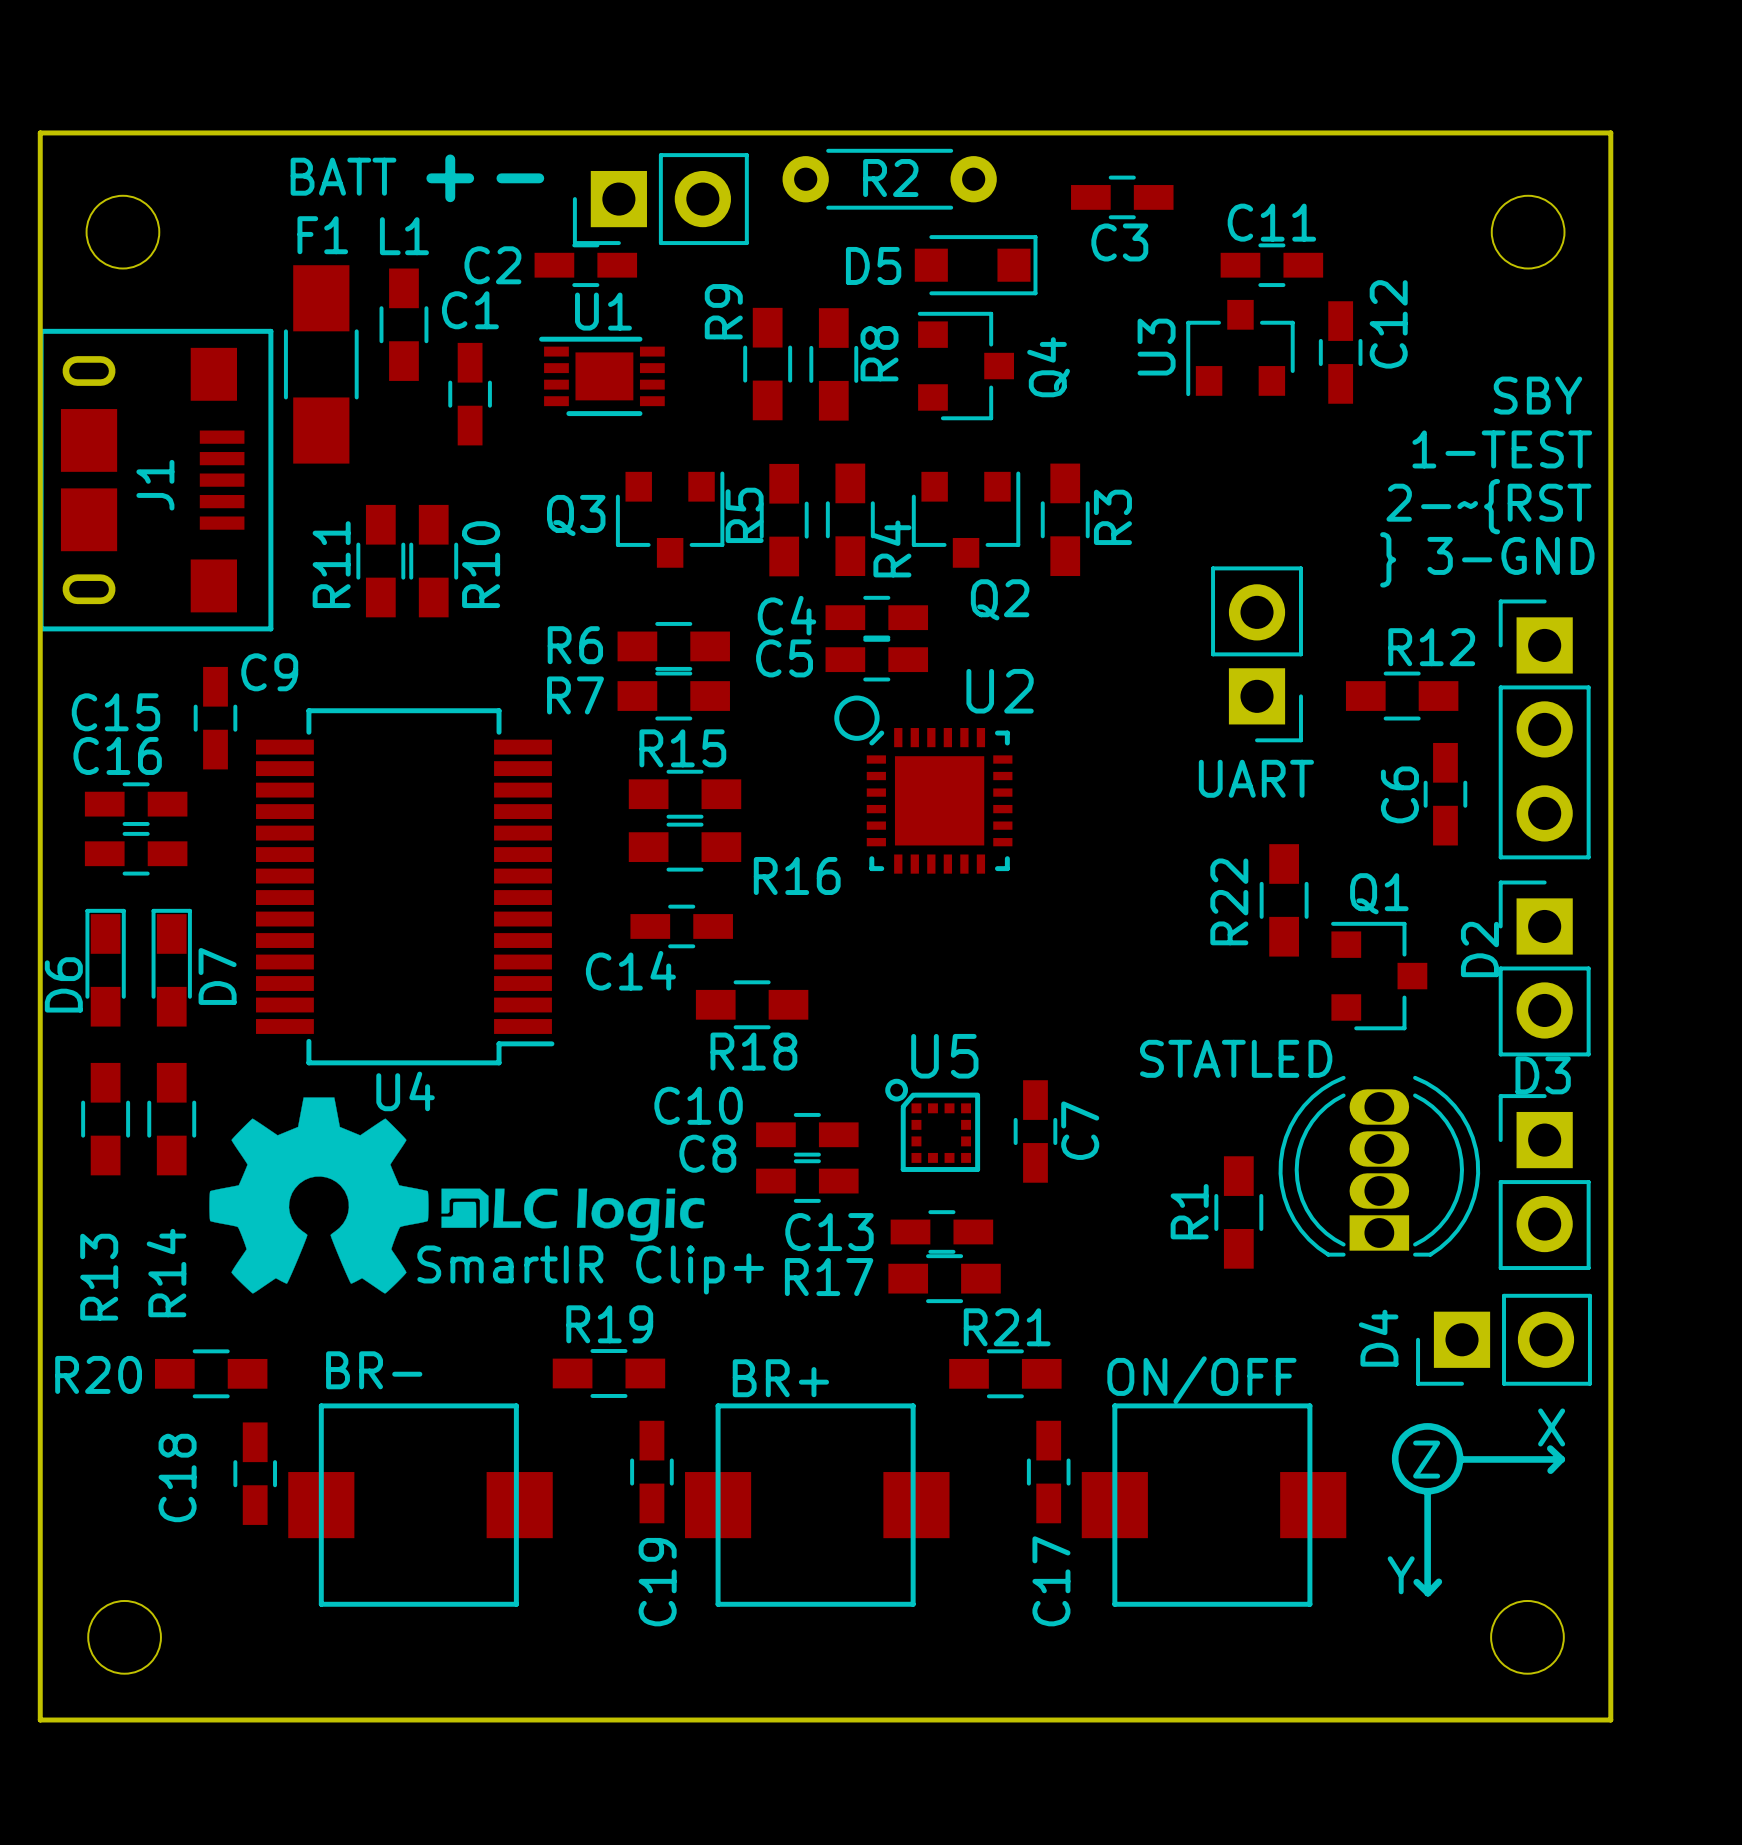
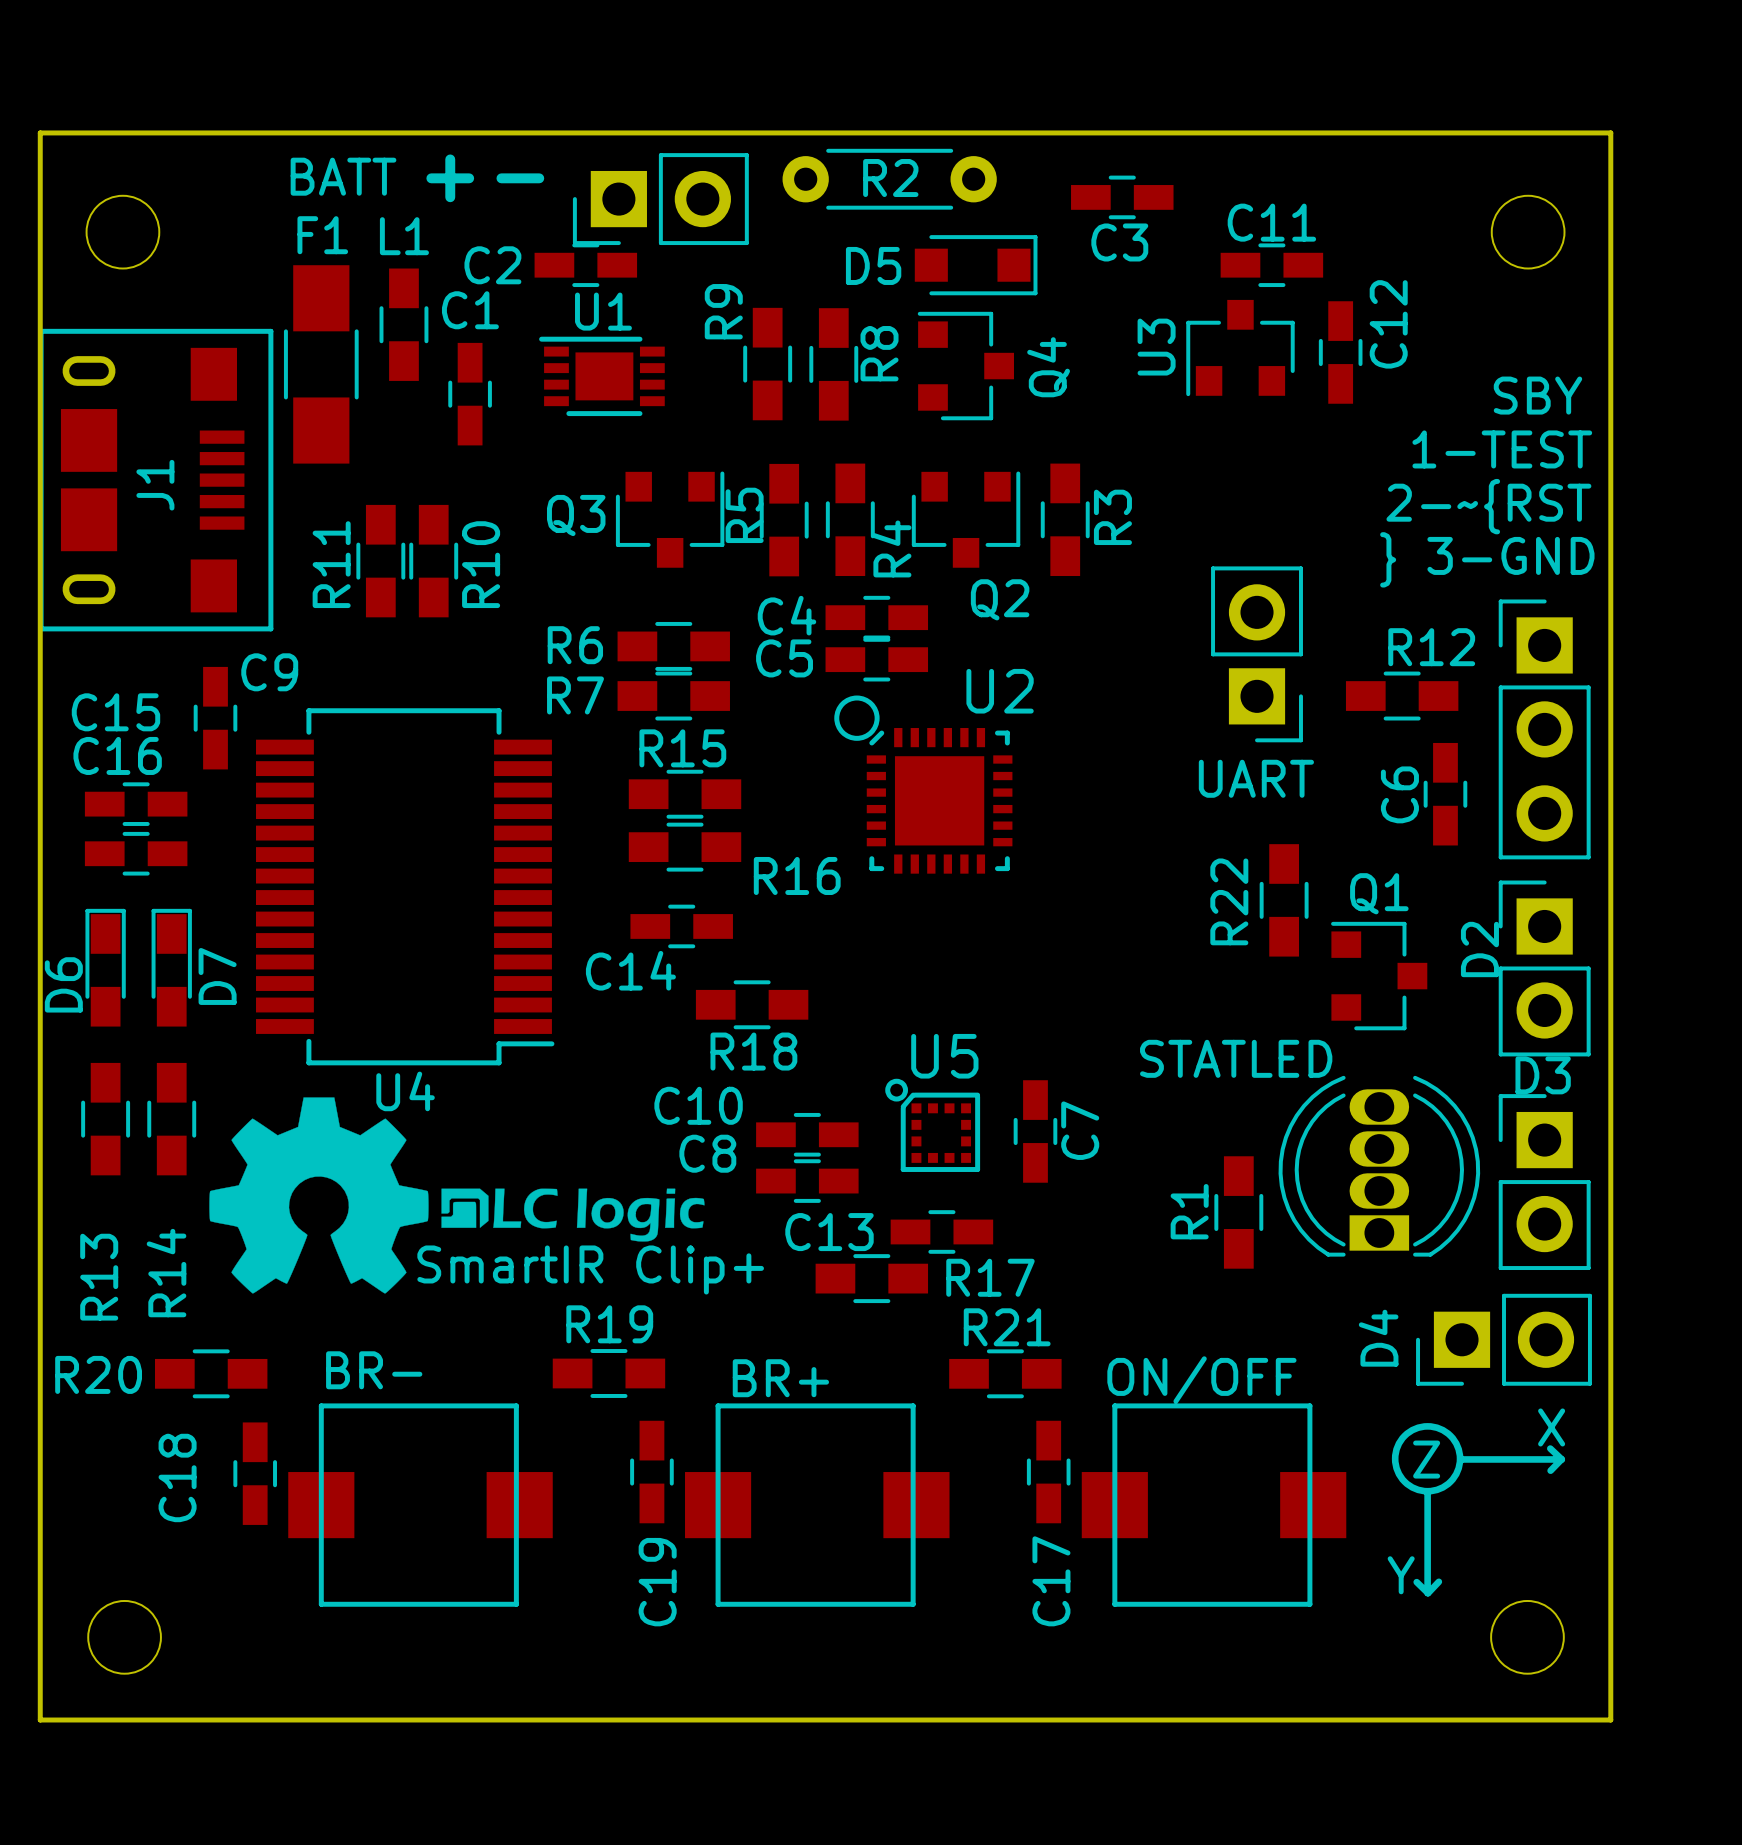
R17 name position: R17 (829, 1277) -> R17 (990, 1277)
R17 position: (944, 1278) -> (871, 1278)

